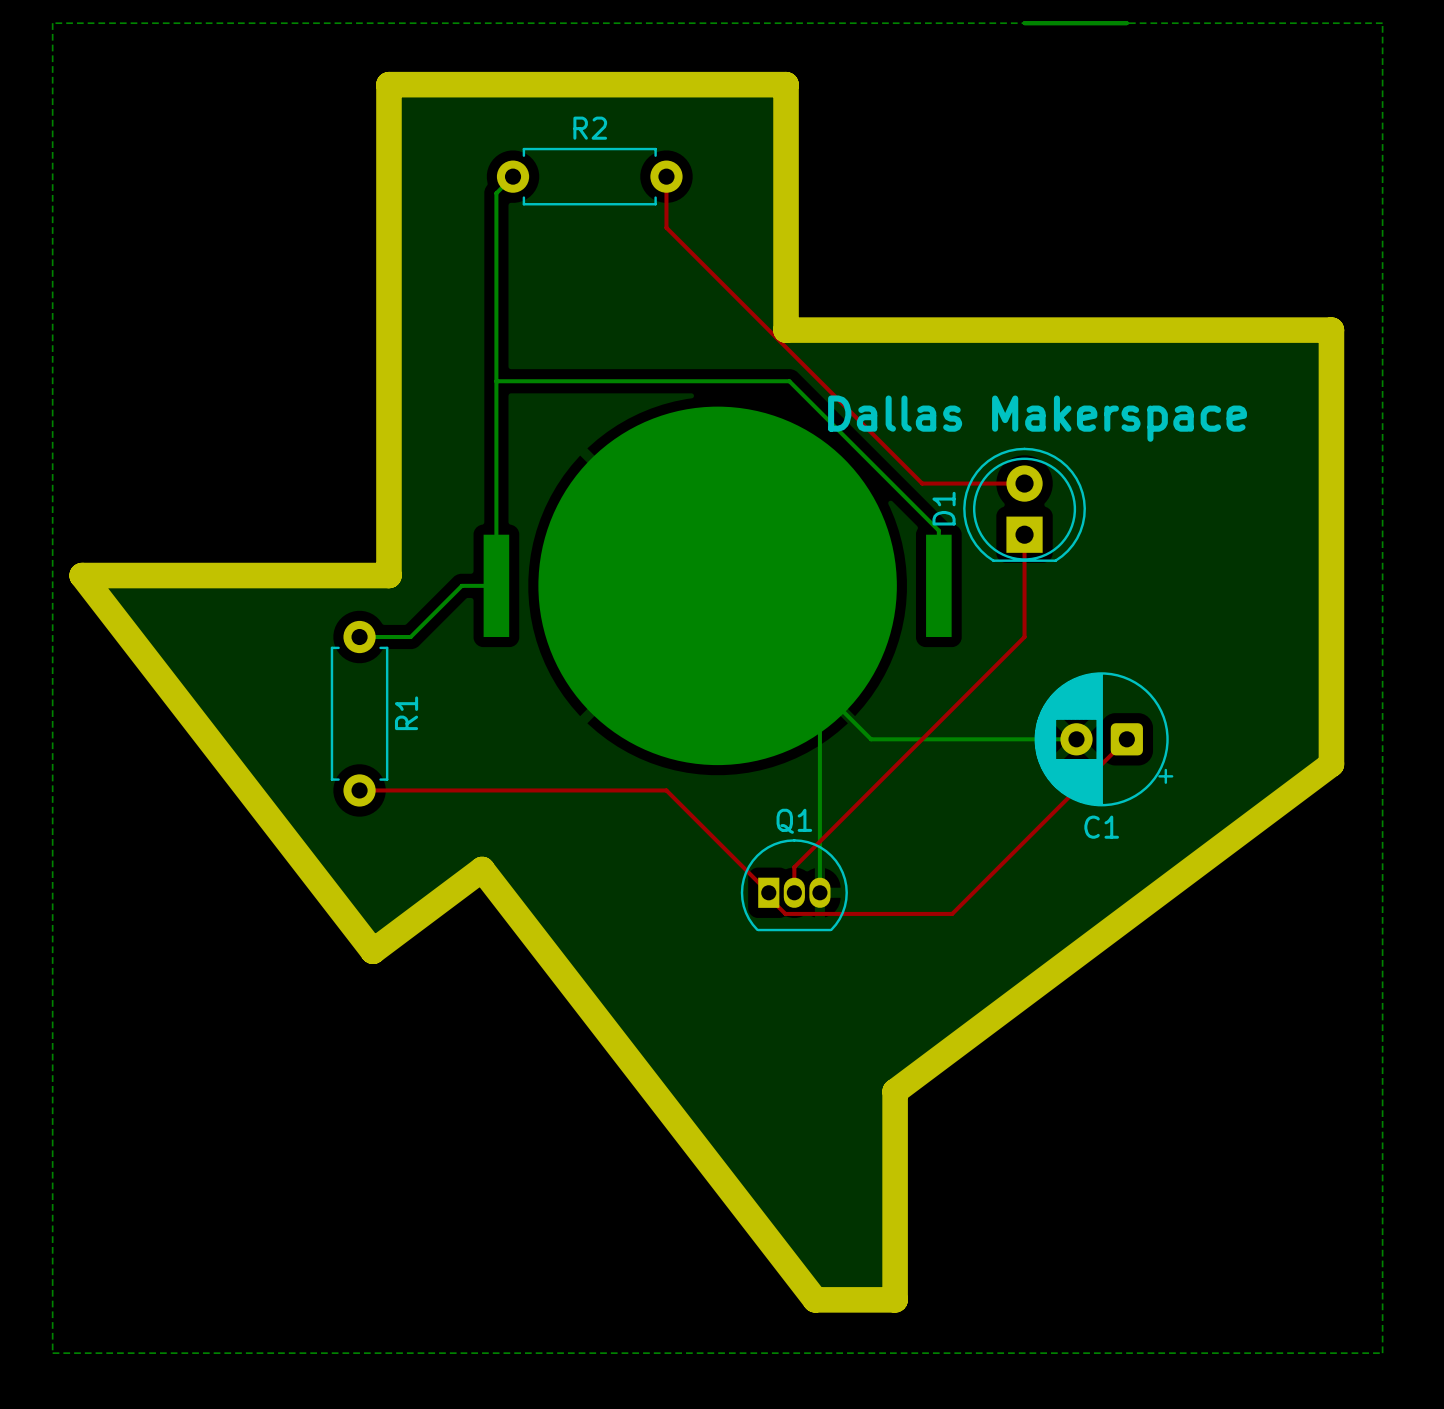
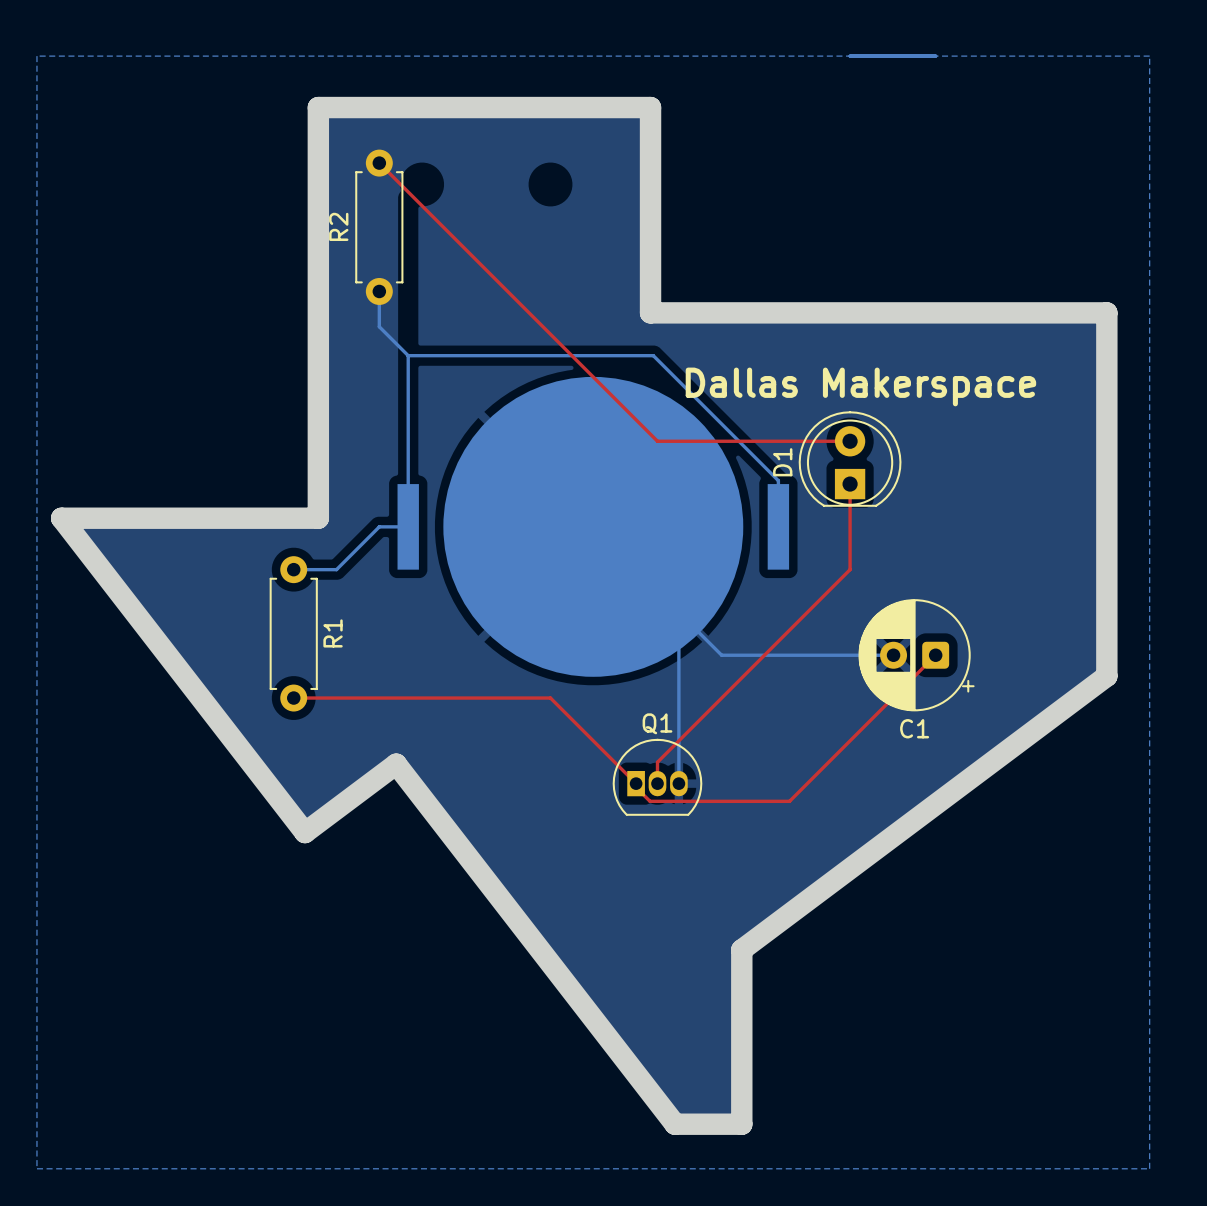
R2 name position: R2 (590, 128) -> R2 (338, 226)
bottom track: (513, 176) (496, 193) (496, 381) -> (379, 291) (379, 326) (408, 355)
R2 rotation: 0° (589, 176) -> 90° clockwise (379, 227)
R2 position: (589, 176) -> (379, 227)
top track: (666, 176) (666, 227) (922, 483) -> (379, 163) (657, 441) (764, 441)

